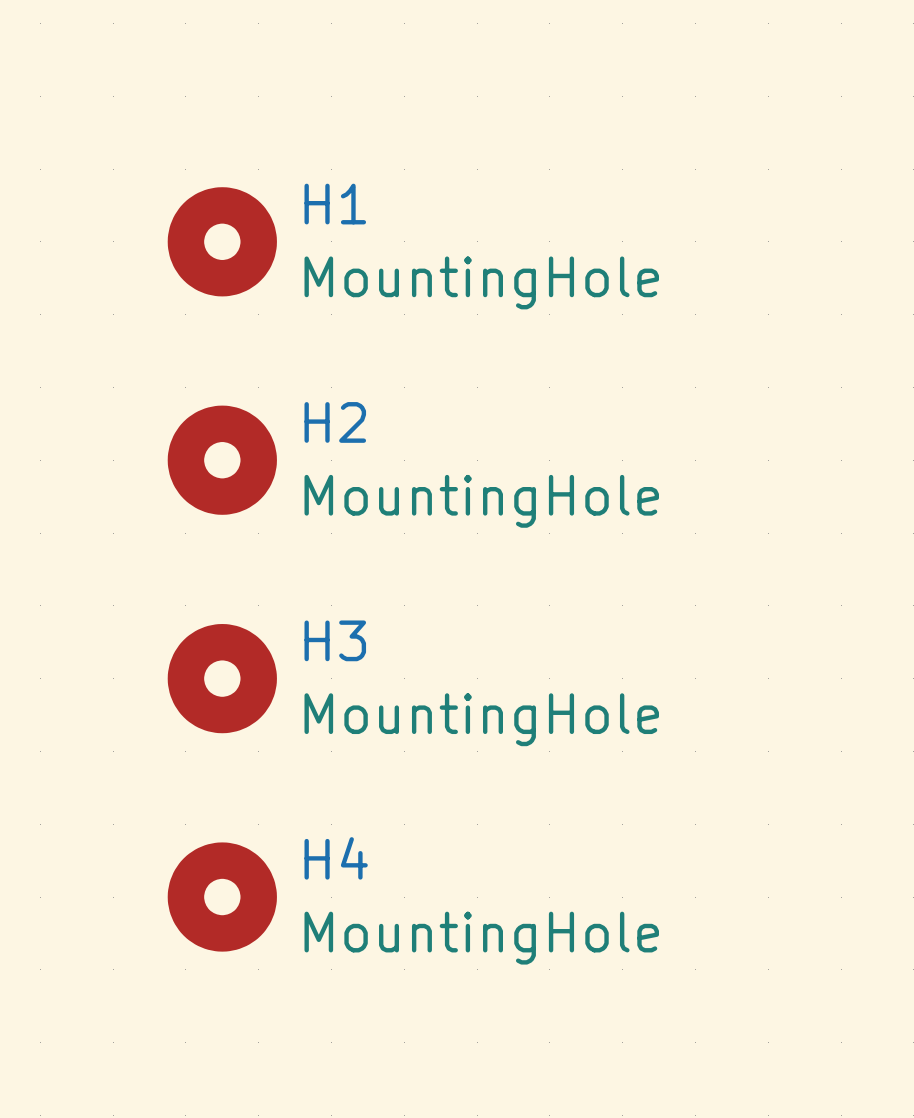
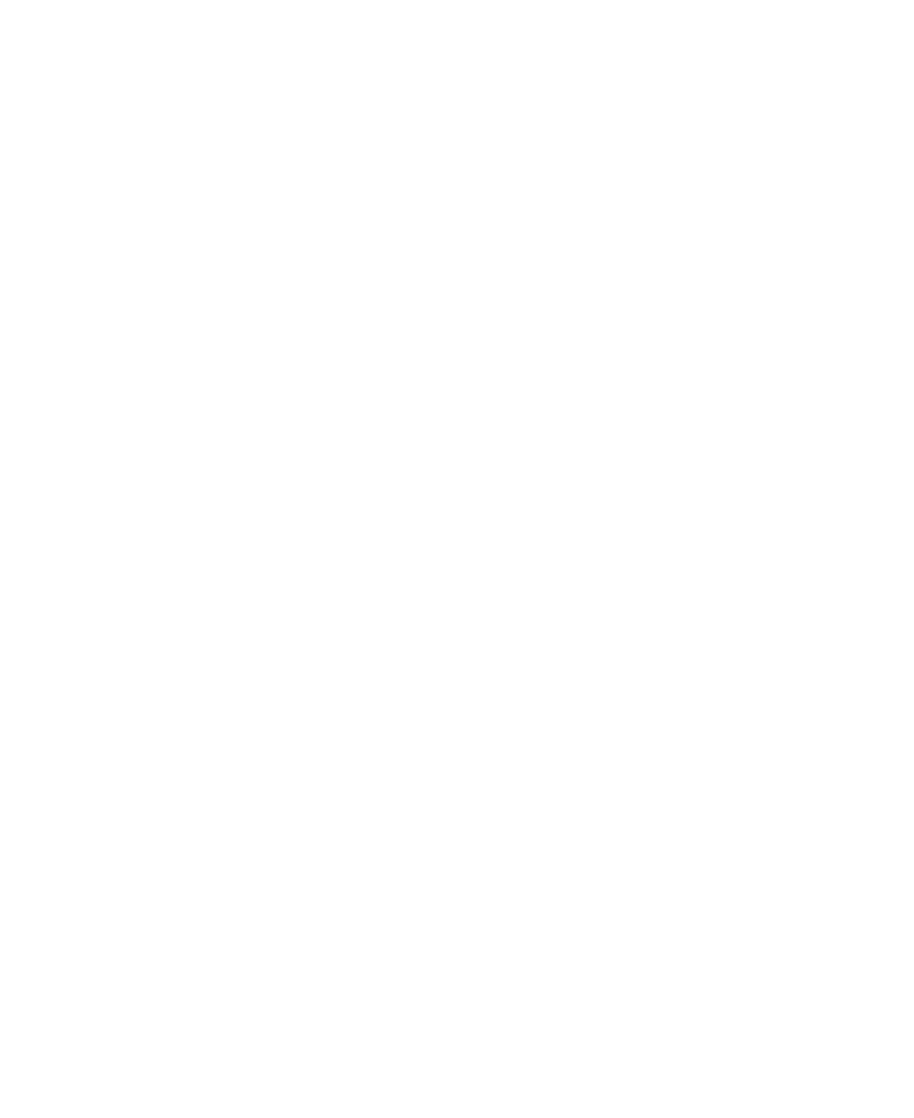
H1: MountingHole (222, 241) -> none
H2: MountingHole (222, 460) -> none
H3: MountingHole (222, 678) -> none
H4: MountingHole (222, 897) -> none

